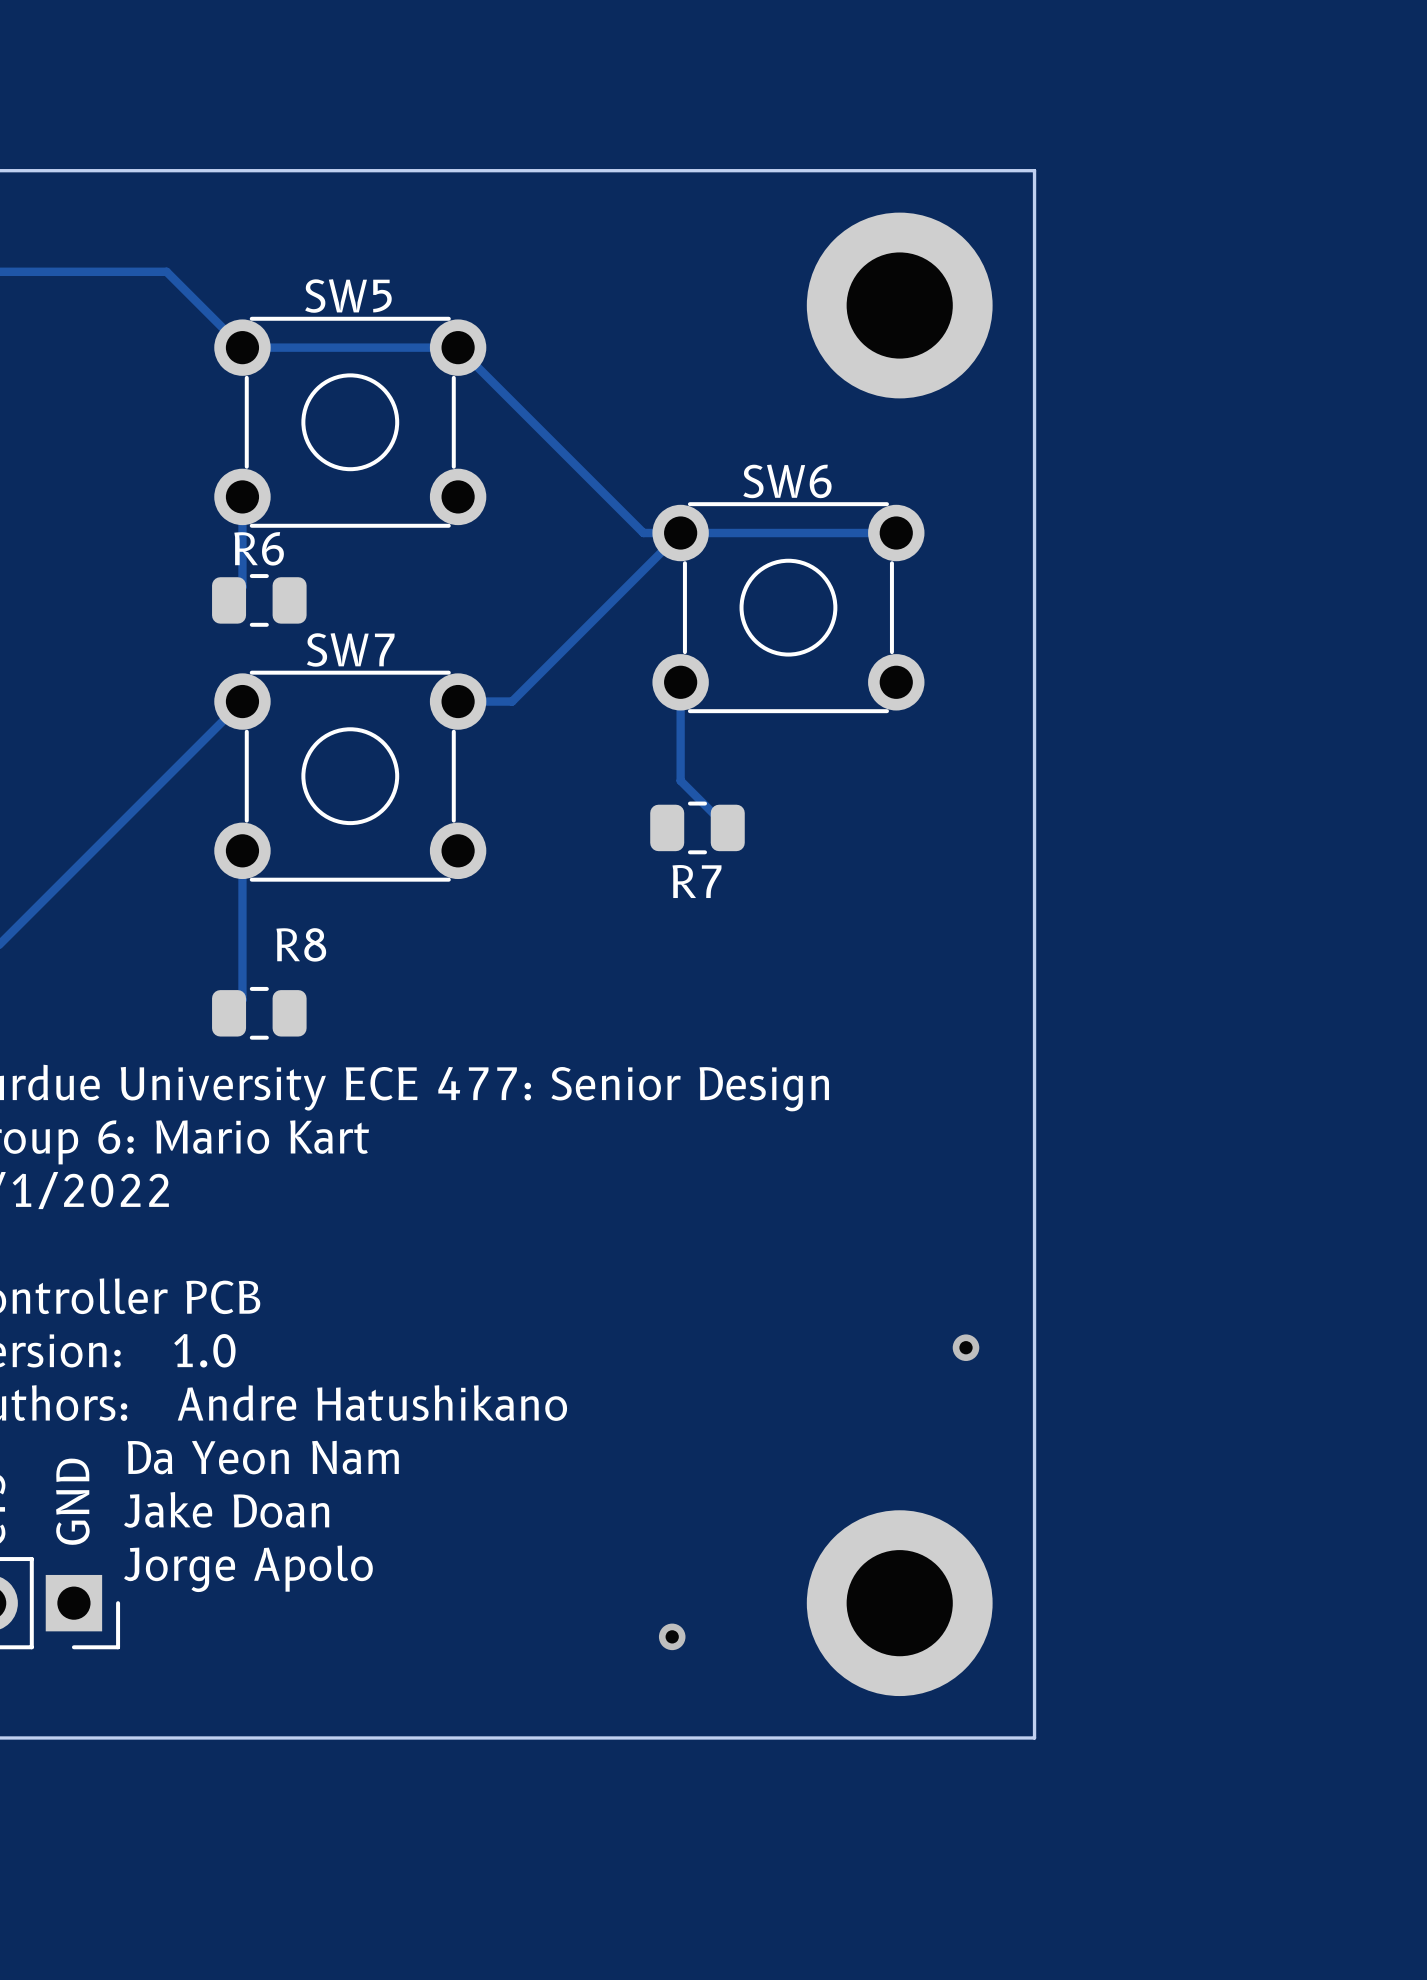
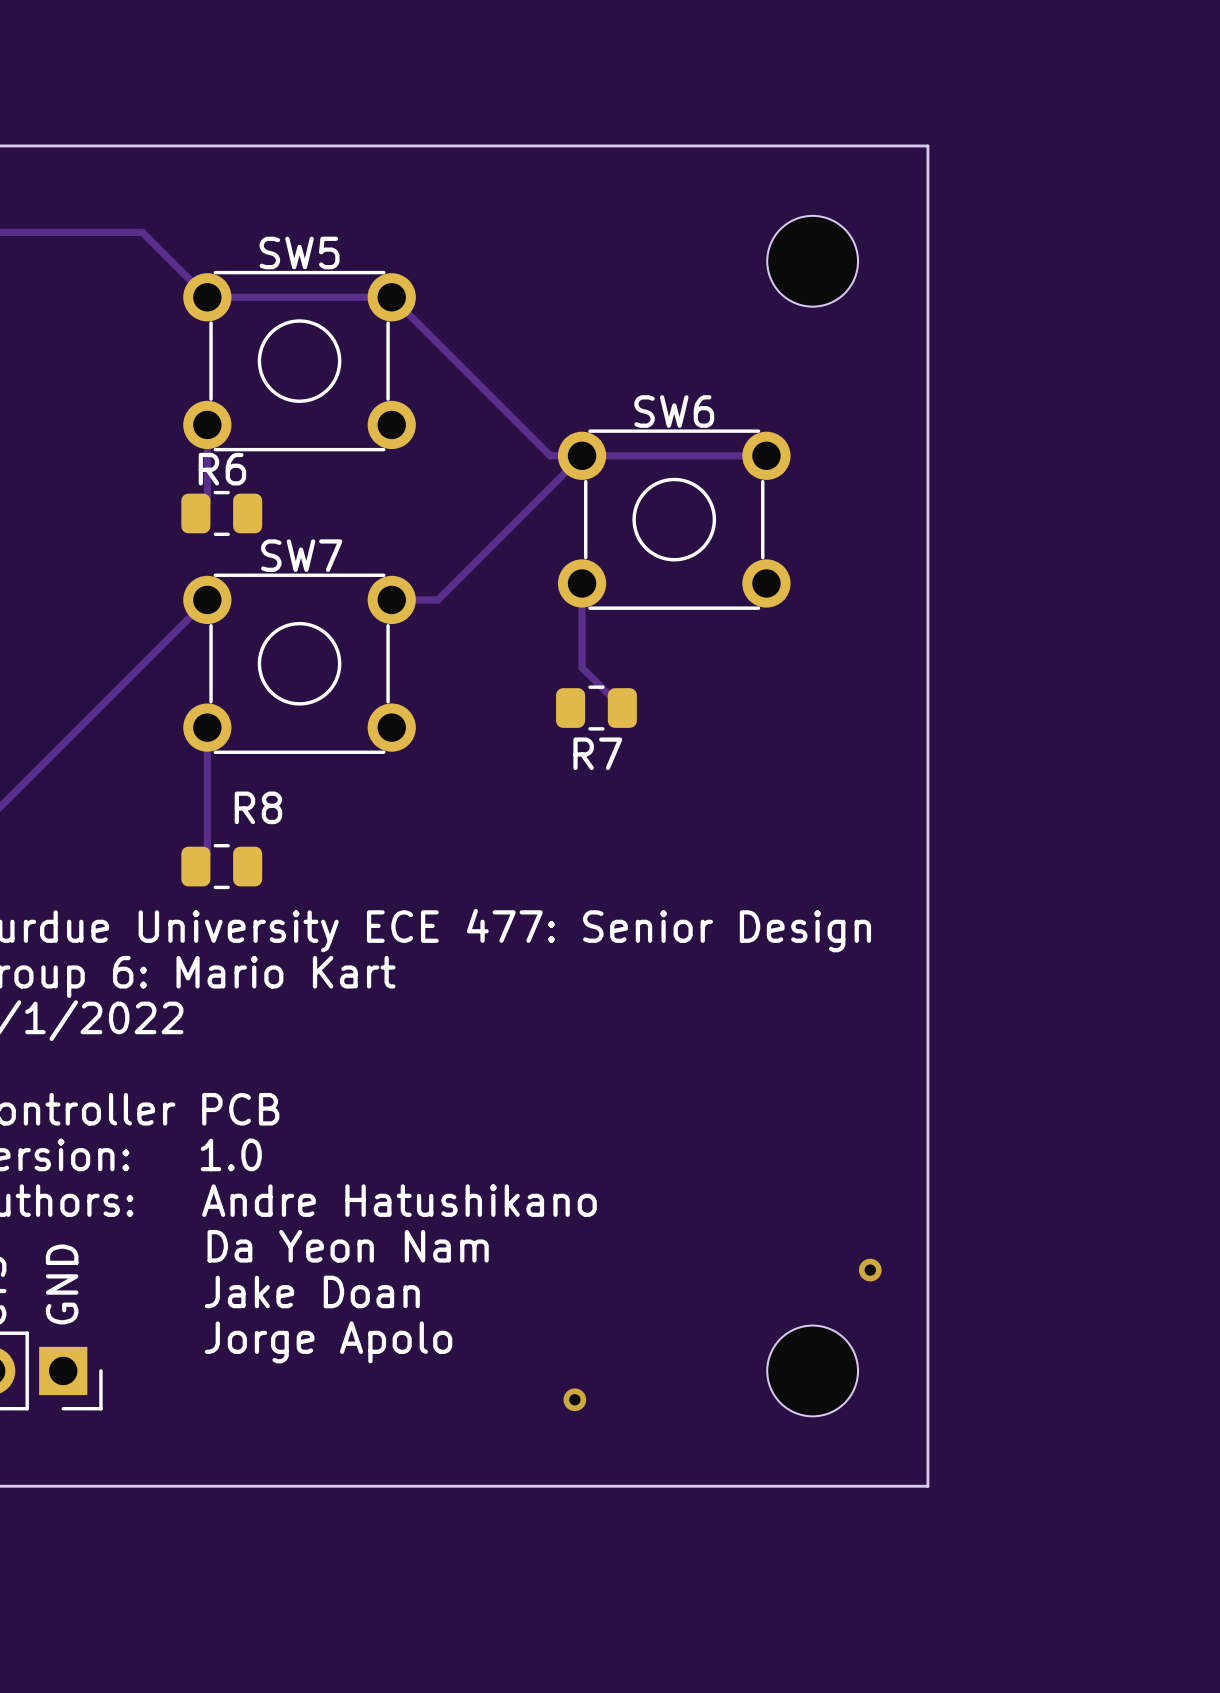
board edge: (1034, 170) (1034, 1737) -> (884, 145) (927, 145) (927, 1486) (884, 1486)
part: (899, 305) -> none
part: none -> (812, 261)
via position: (966, 1347) -> (870, 1270)
part: (899, 1603) -> none
part: none -> (812, 1370)

